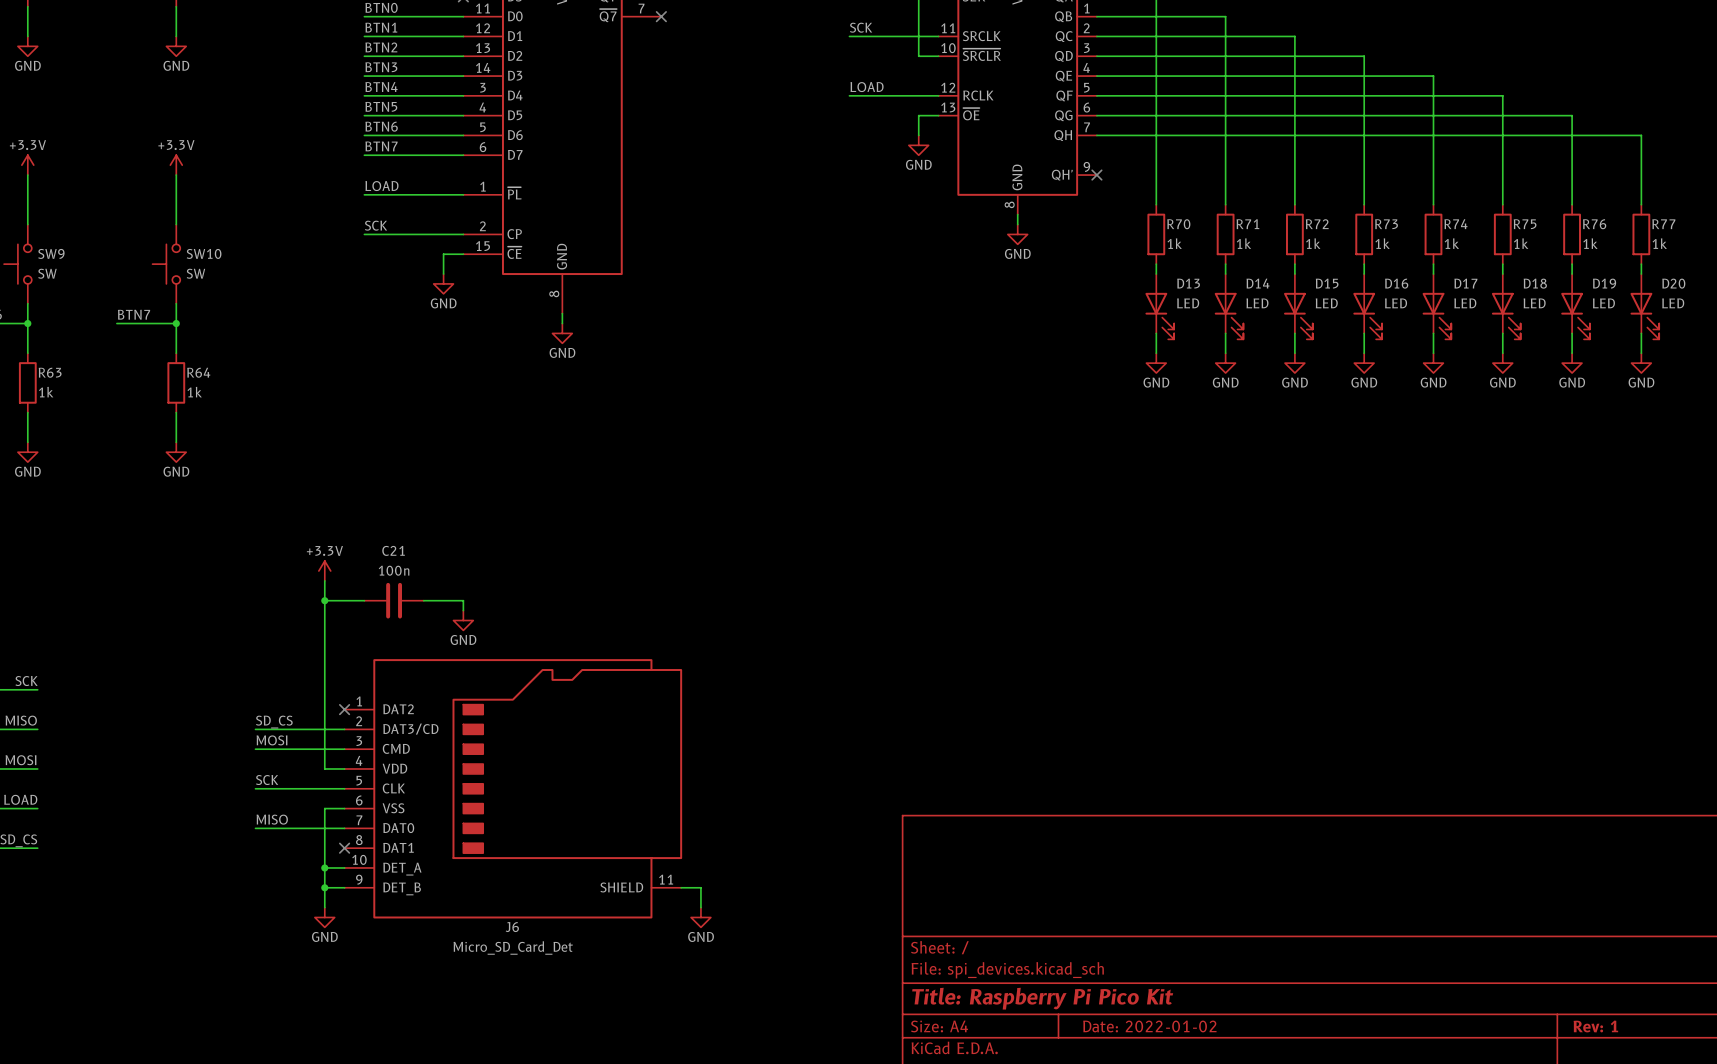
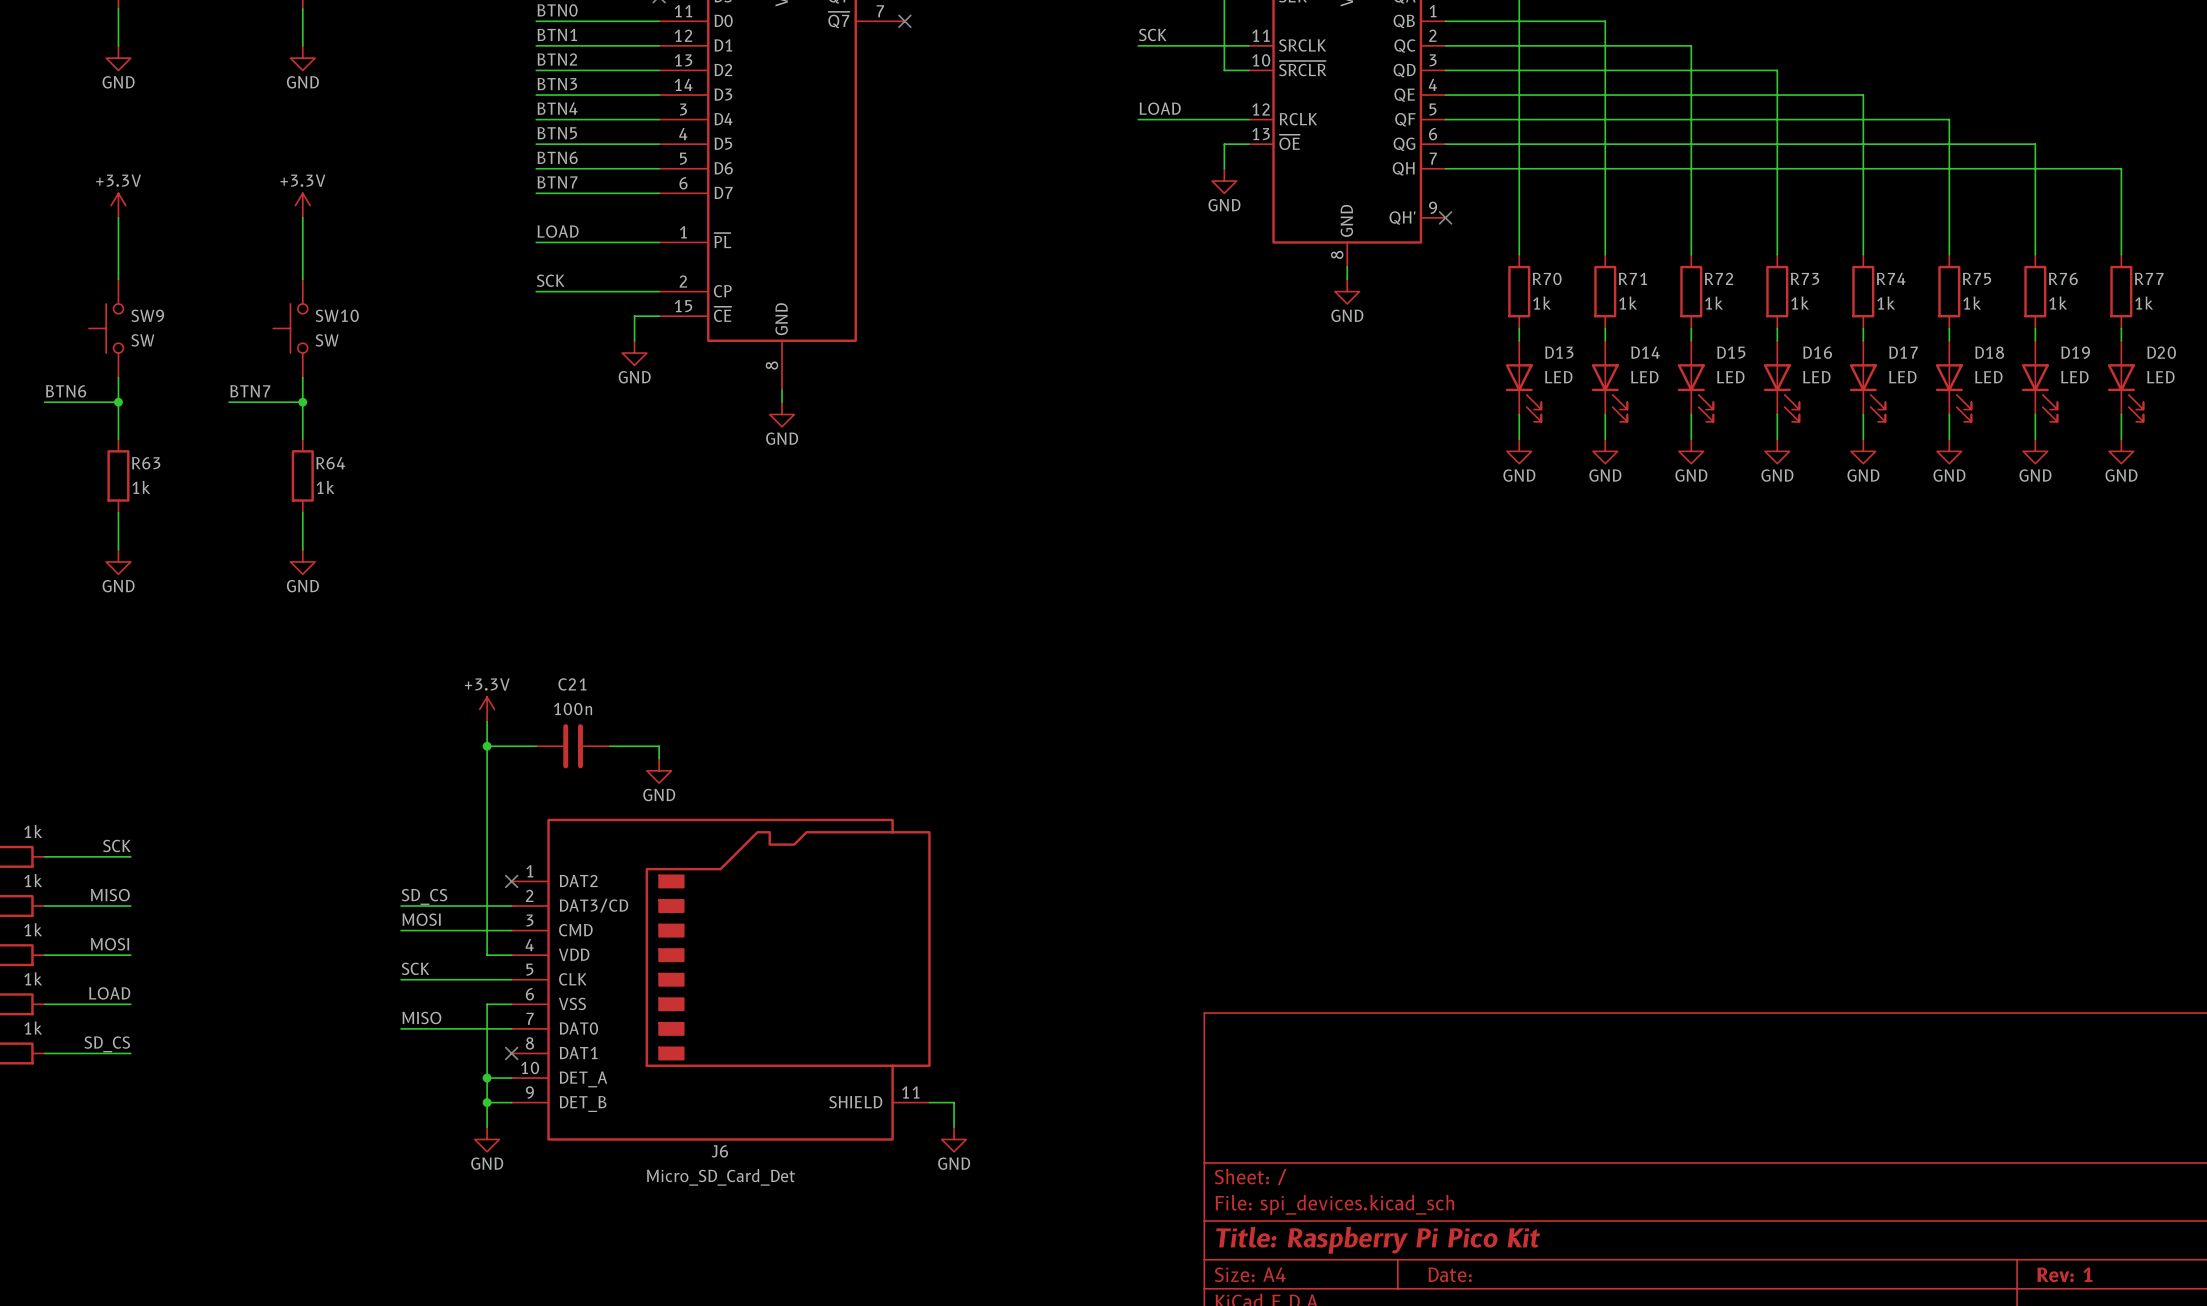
title block: Date: 2022-01-02 (1149, 1026) -> Date: (1450, 1274)

